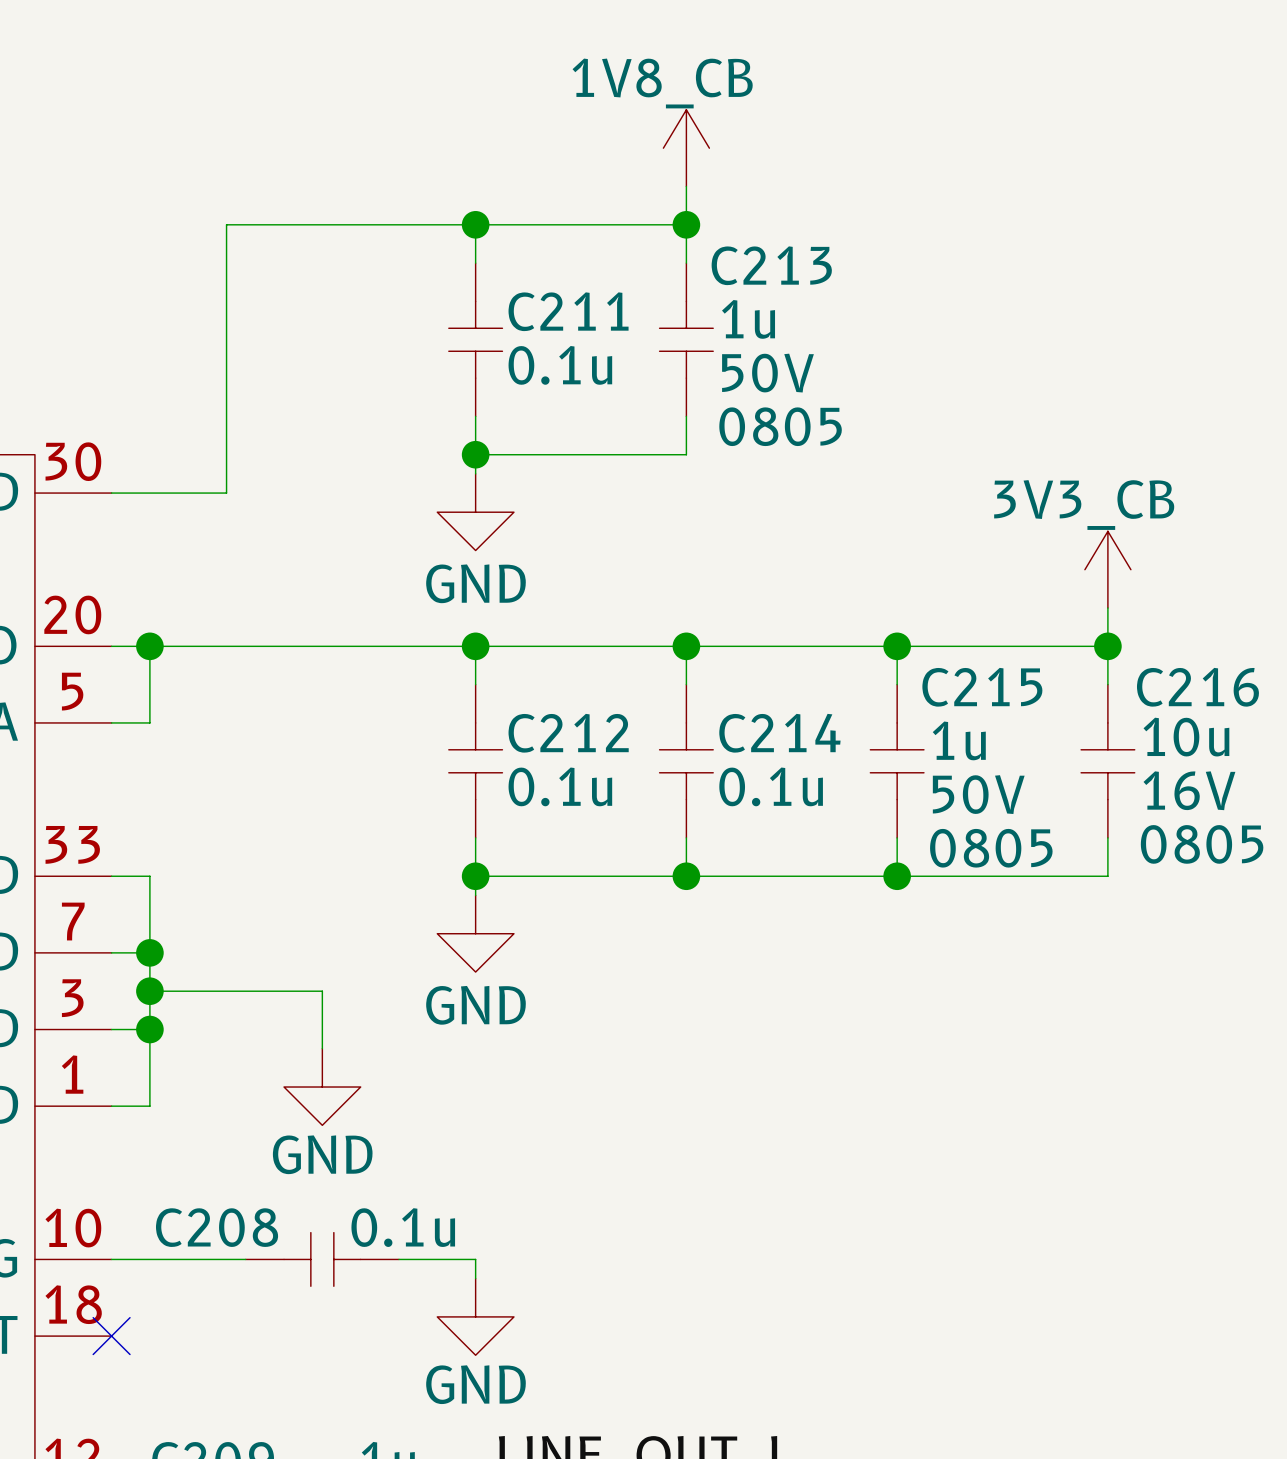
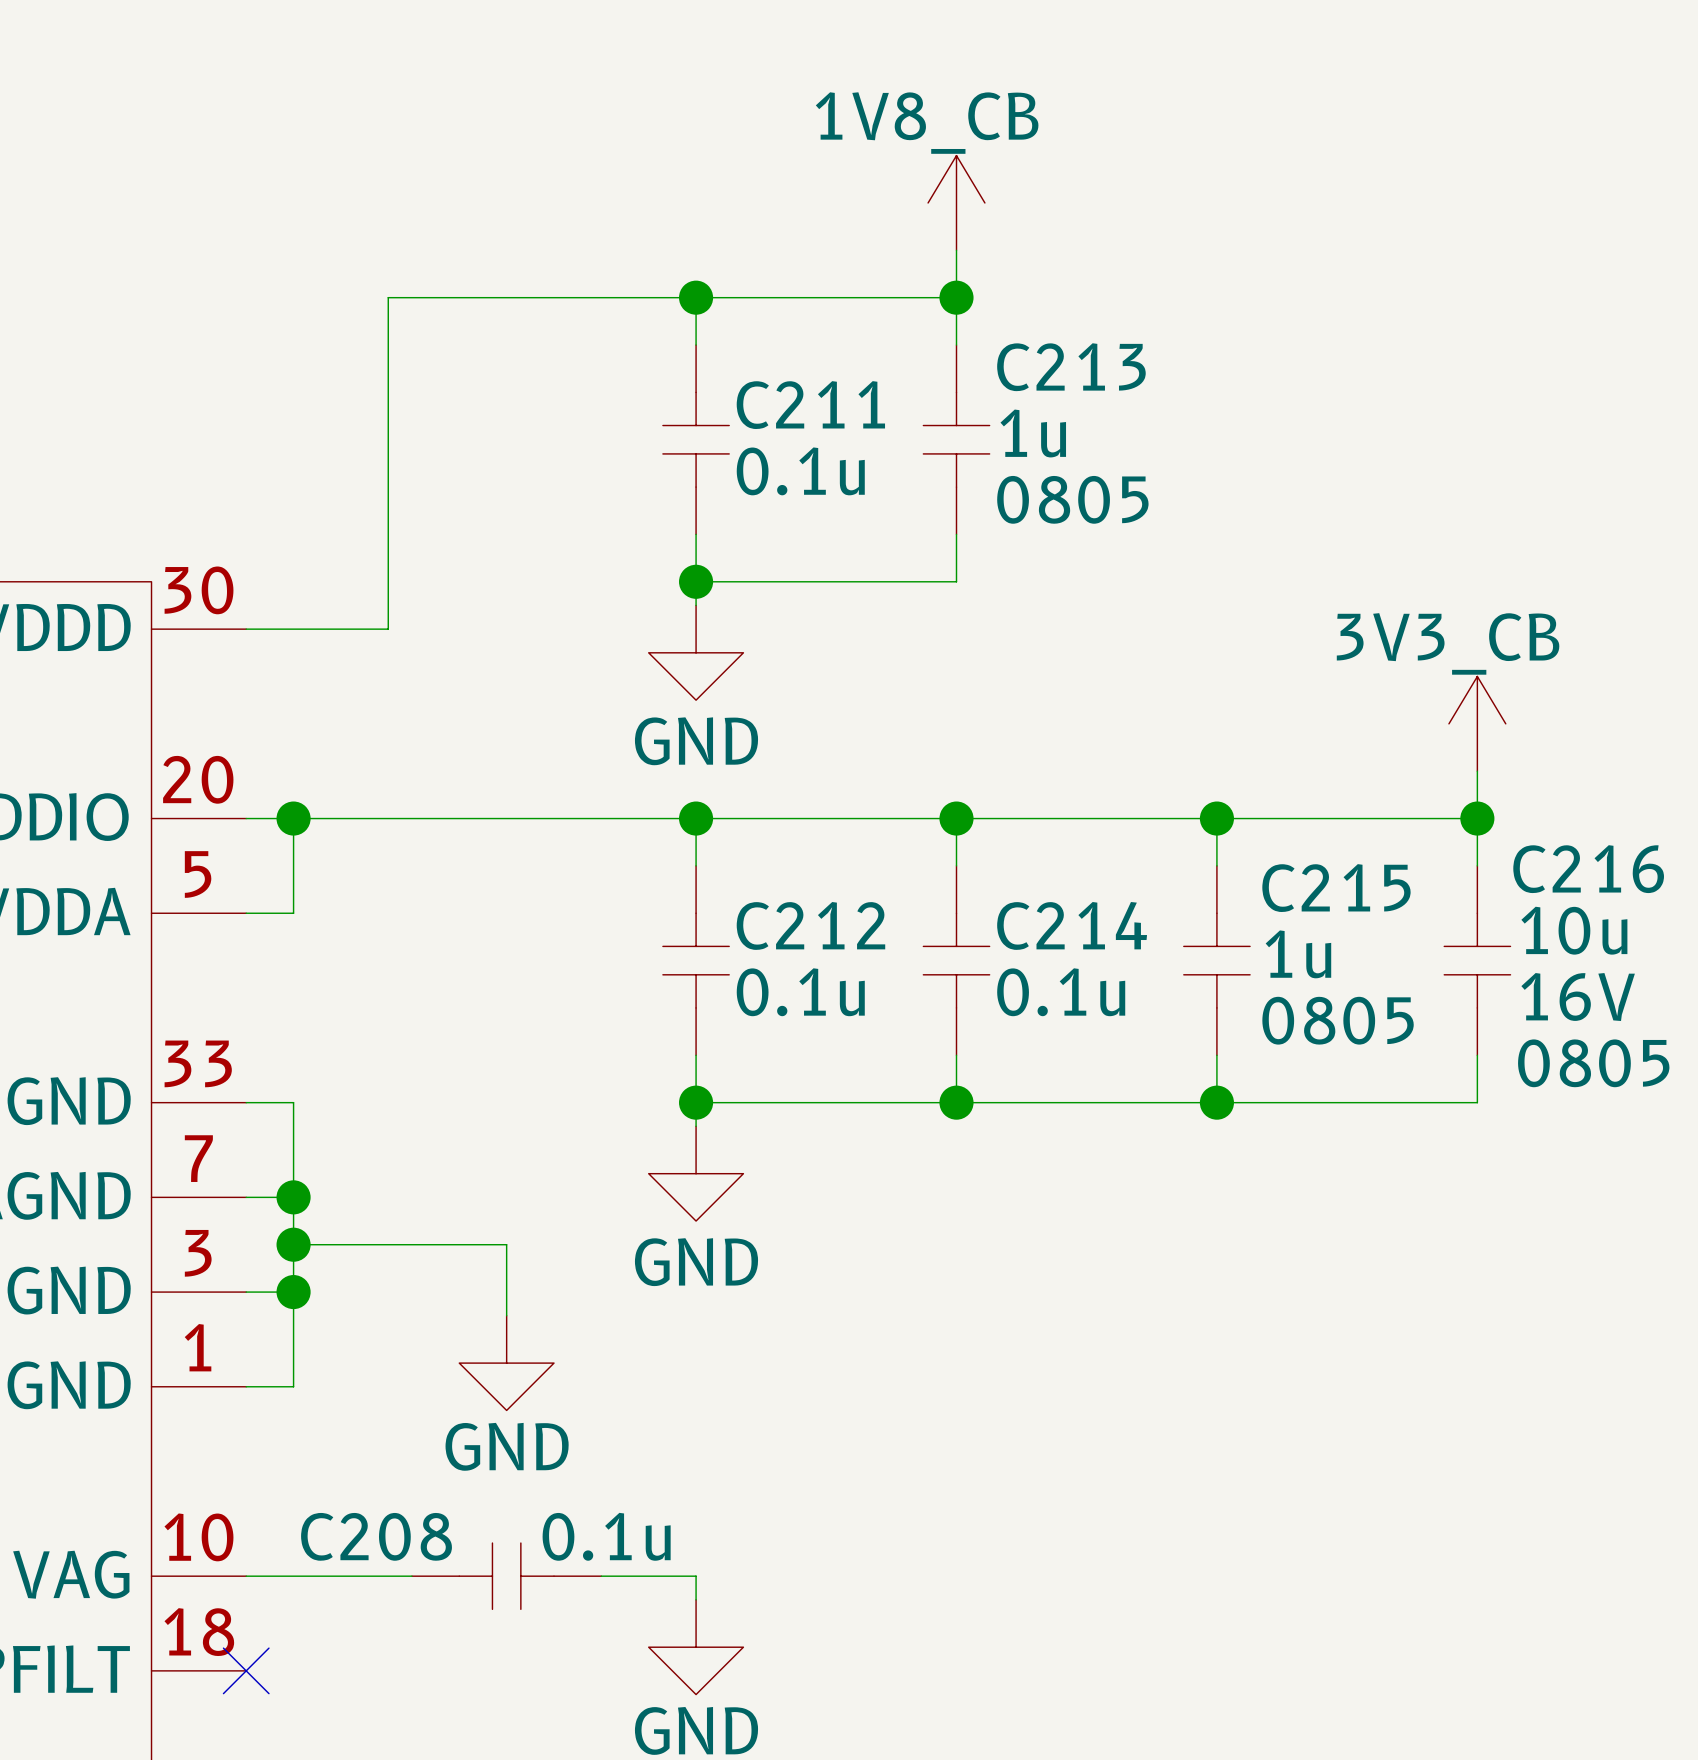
C213 name position: C213 (771, 265) -> C213 (1071, 367)
C213 value position: 1u (748, 319) -> 1u (1033, 433)
C213 text: 50V (767, 373) -> none
C213 text position: 0805 (780, 426) -> 0805 (1072, 499)
C215 name position: C215 (982, 687) -> C215 (1336, 888)
C215 value position: 1u (959, 740) -> 1u (1298, 954)
C215 text: 50V (978, 794) -> none
C215 text position: 0805 (991, 848) -> 0805 (1338, 1020)

